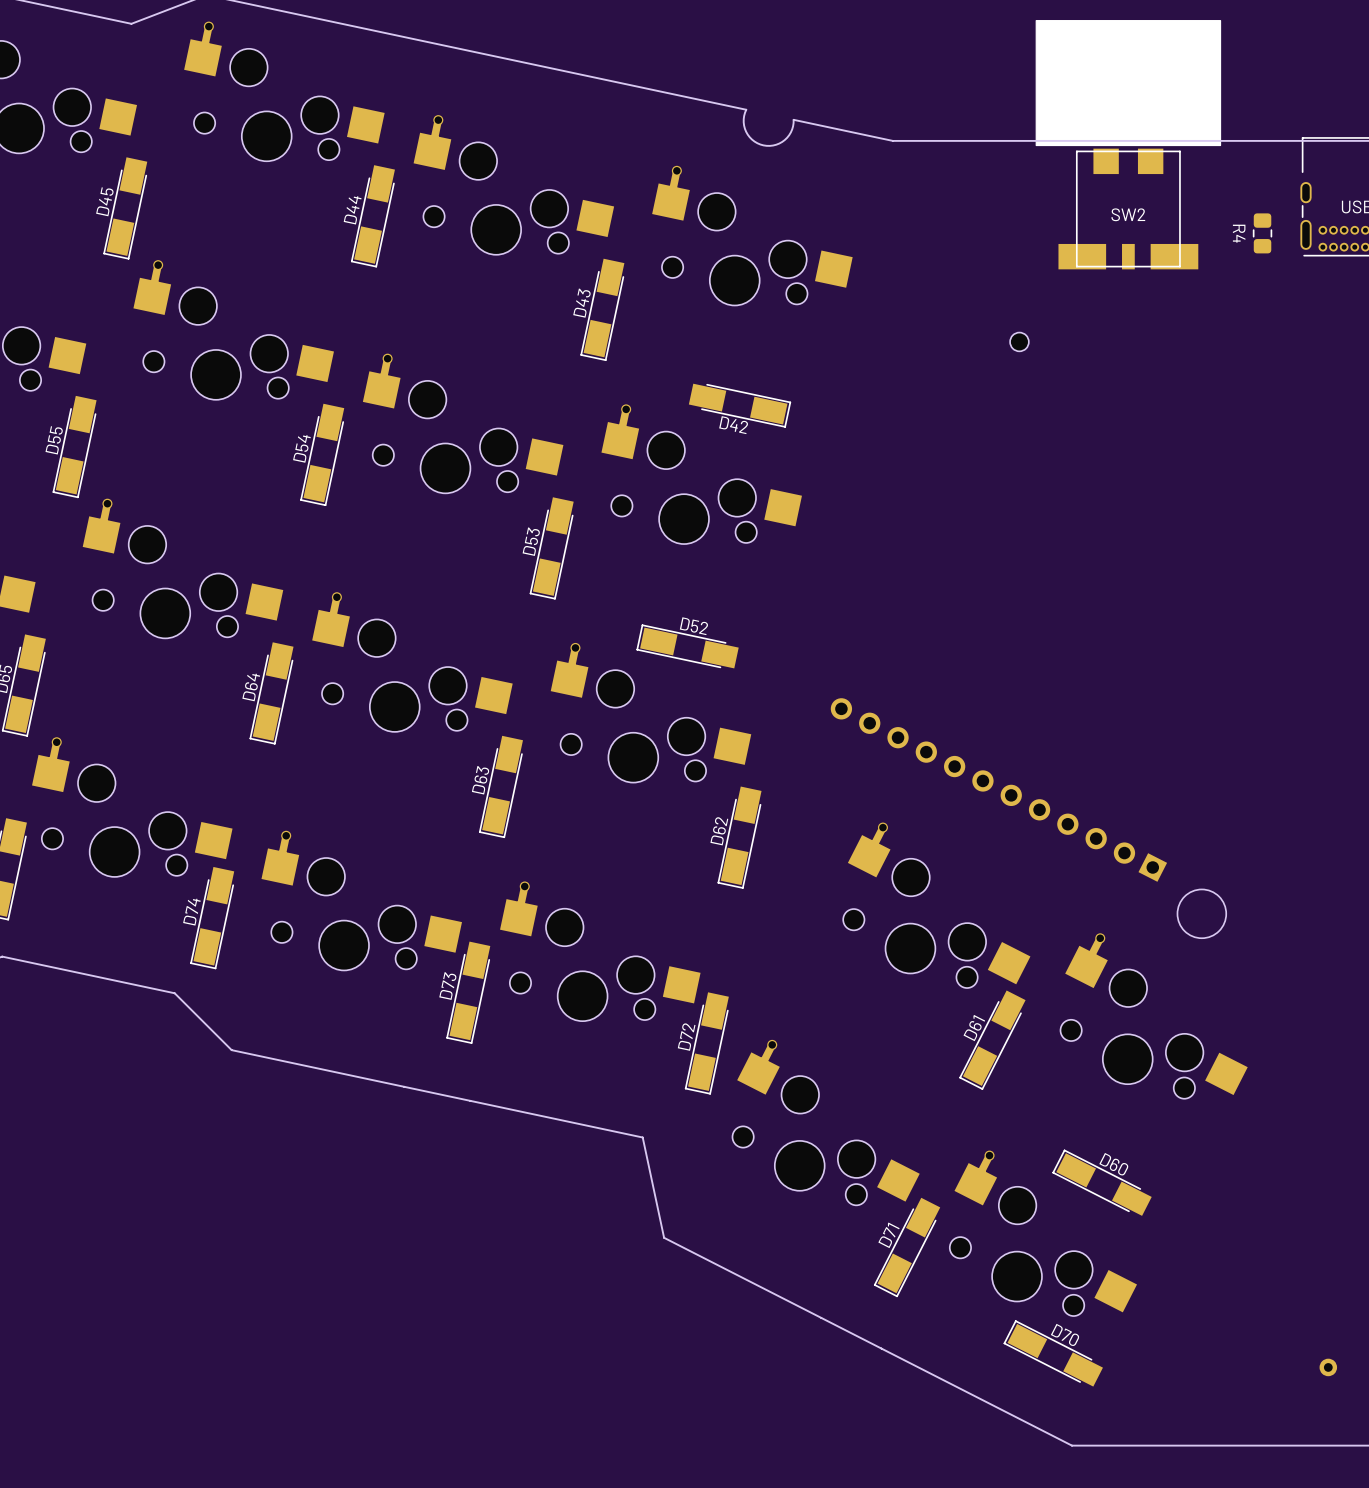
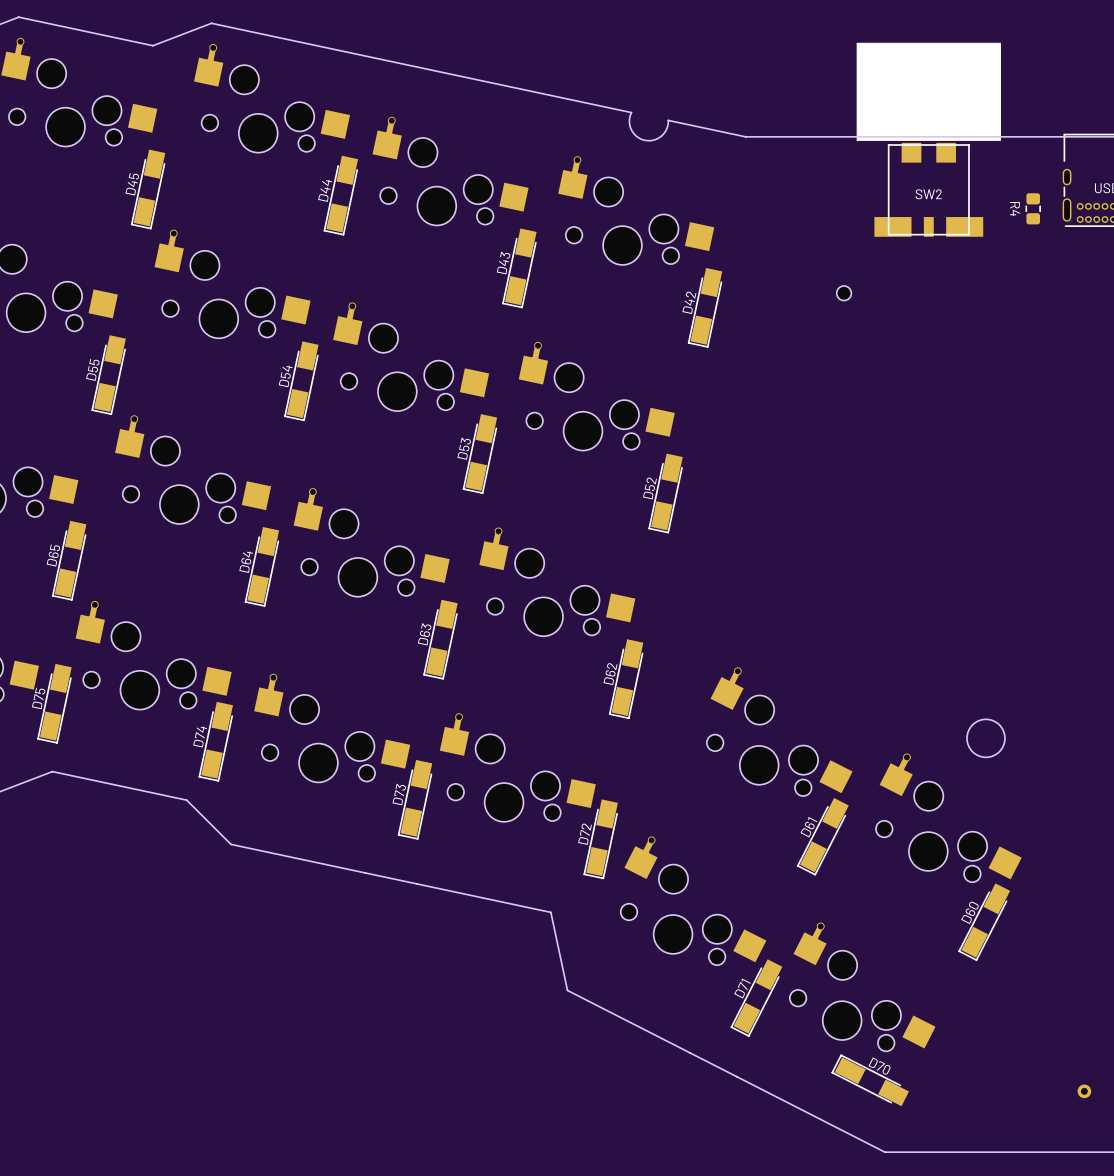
D42 rotation: 0° (739, 405) -> 90° clockwise (705, 307)
D42 position: (739, 405) -> (705, 307)
D52 rotation: 0° (687, 646) -> 90° counterclockwise (665, 493)
D52 position: (687, 646) -> (665, 493)
part: (998, 790) -> none
D60 rotation: 0° (1102, 1182) -> 90° counterclockwise (984, 922)
D60 position: (1102, 1182) -> (984, 922)

